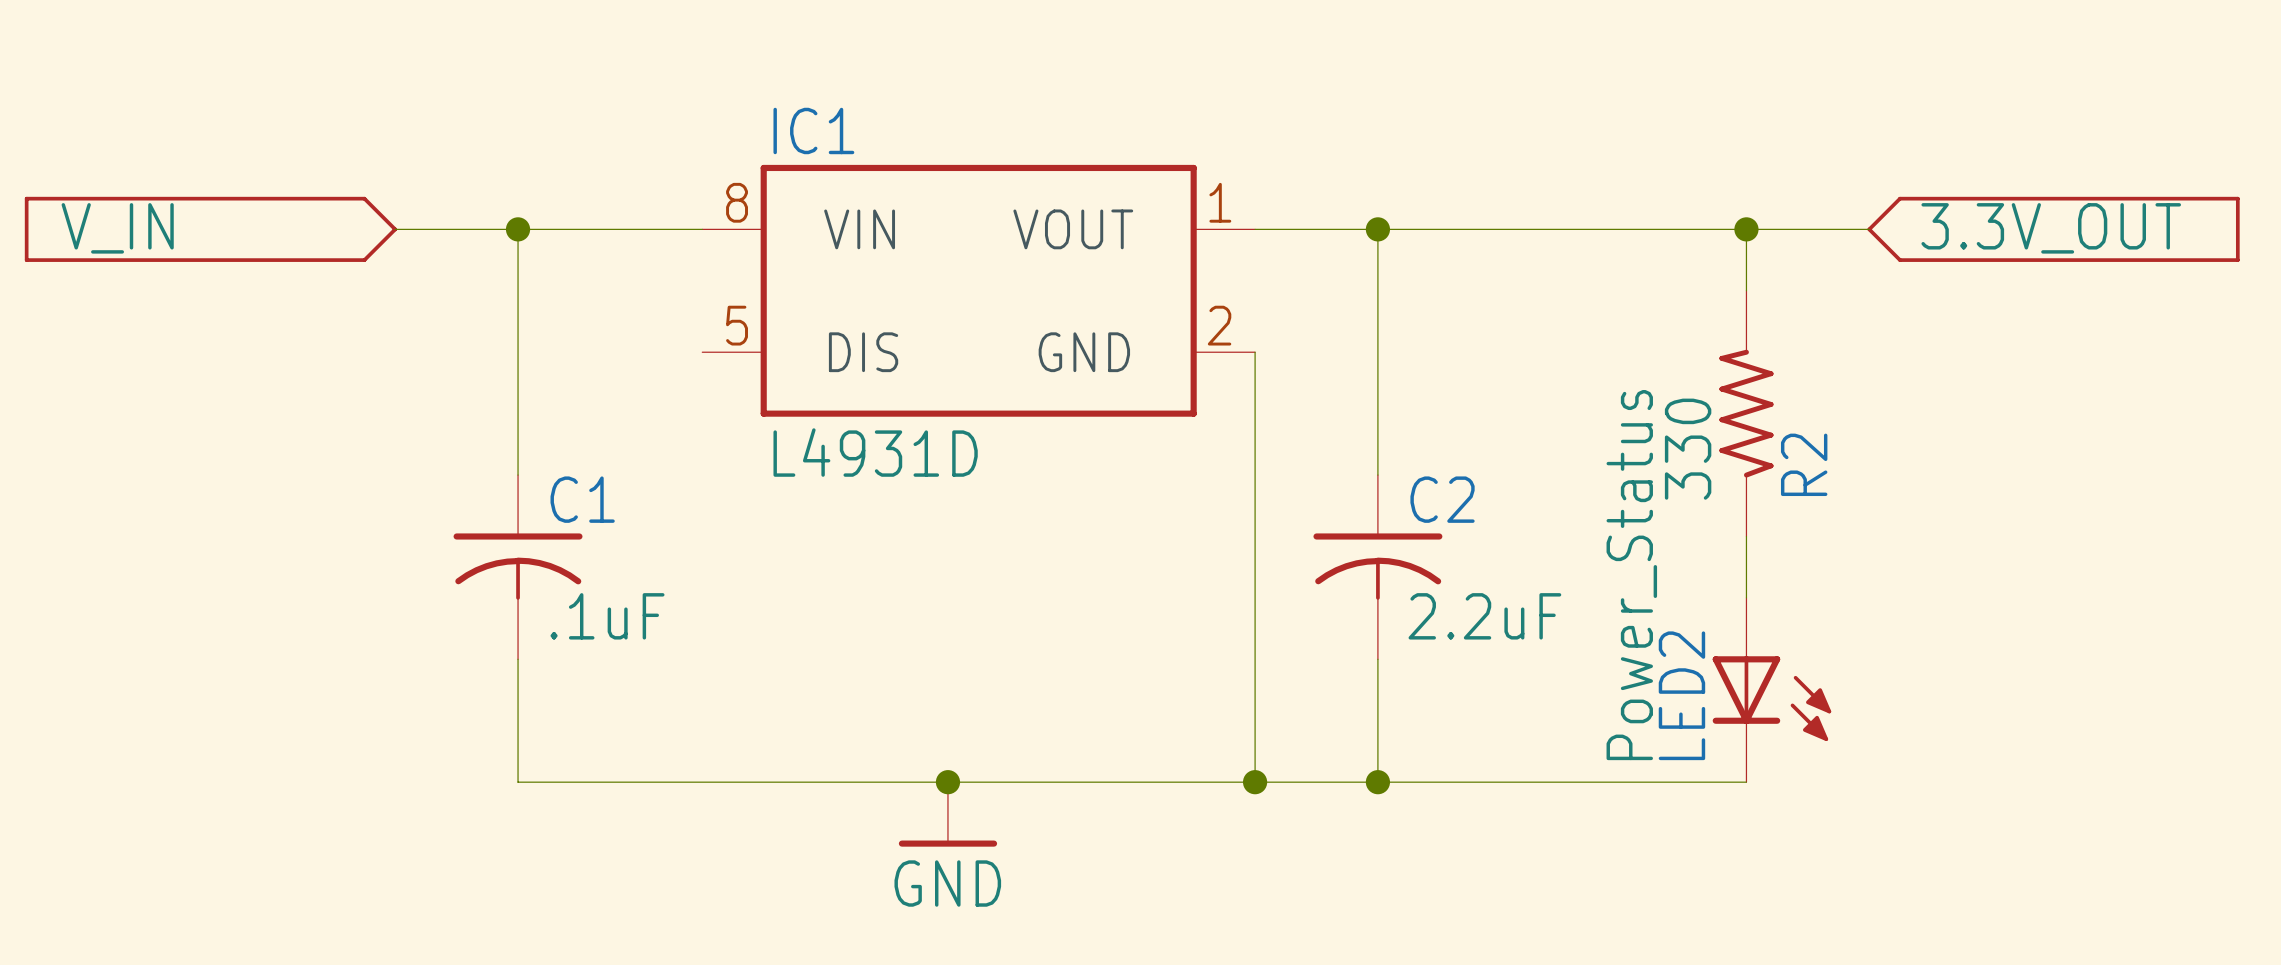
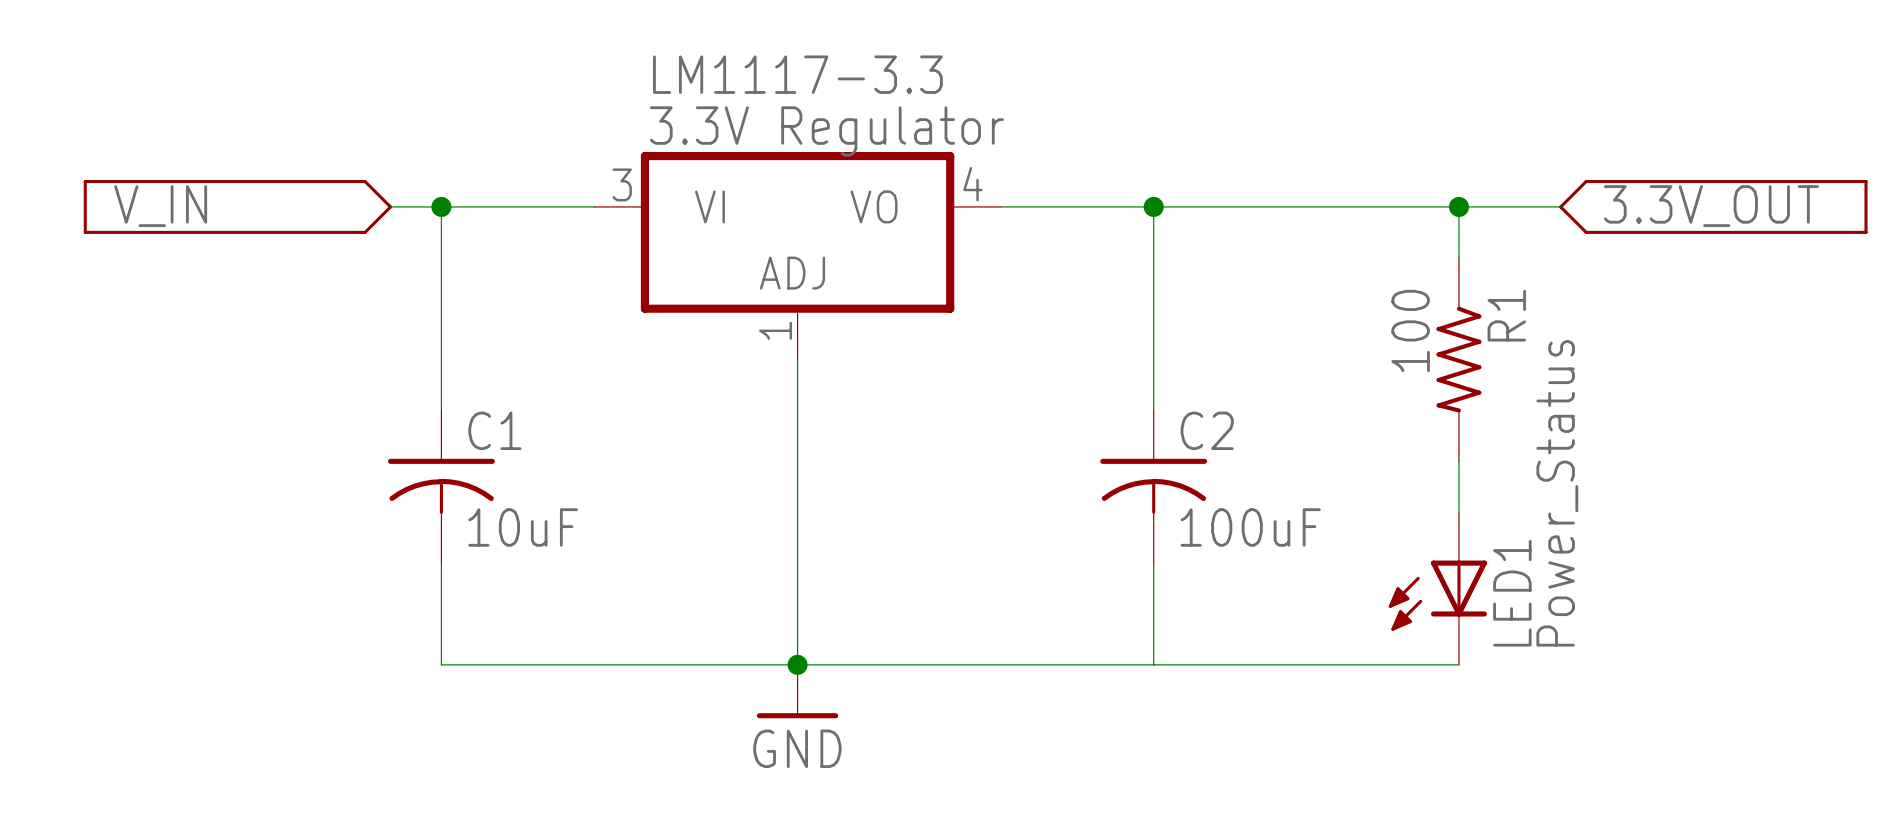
part position: (210, 229) -> (237, 206)
wire: (395, 229) (456, 229) -> none
LM1117-3.3: none -> 3.3V Regulator (797, 255)
IC1: L4931D (978, 290) -> none
wire: (1255, 352) (1255, 782) -> none
wire: none -> (797, 359) (797, 664)
R2: 330 (1746, 413) -> none
R1: none -> 100 (1458, 359)
C1 value: .1uF (607, 616) -> 10uF (523, 527)
C2 value: 2.2uF (1484, 616) -> 100uF (1250, 527)
LED1: none -> Power_Status (1437, 588)
LED2: Power_Status (1771, 690) -> none
junction: (1255, 782) -> none
junction: (1377, 782) -> none

